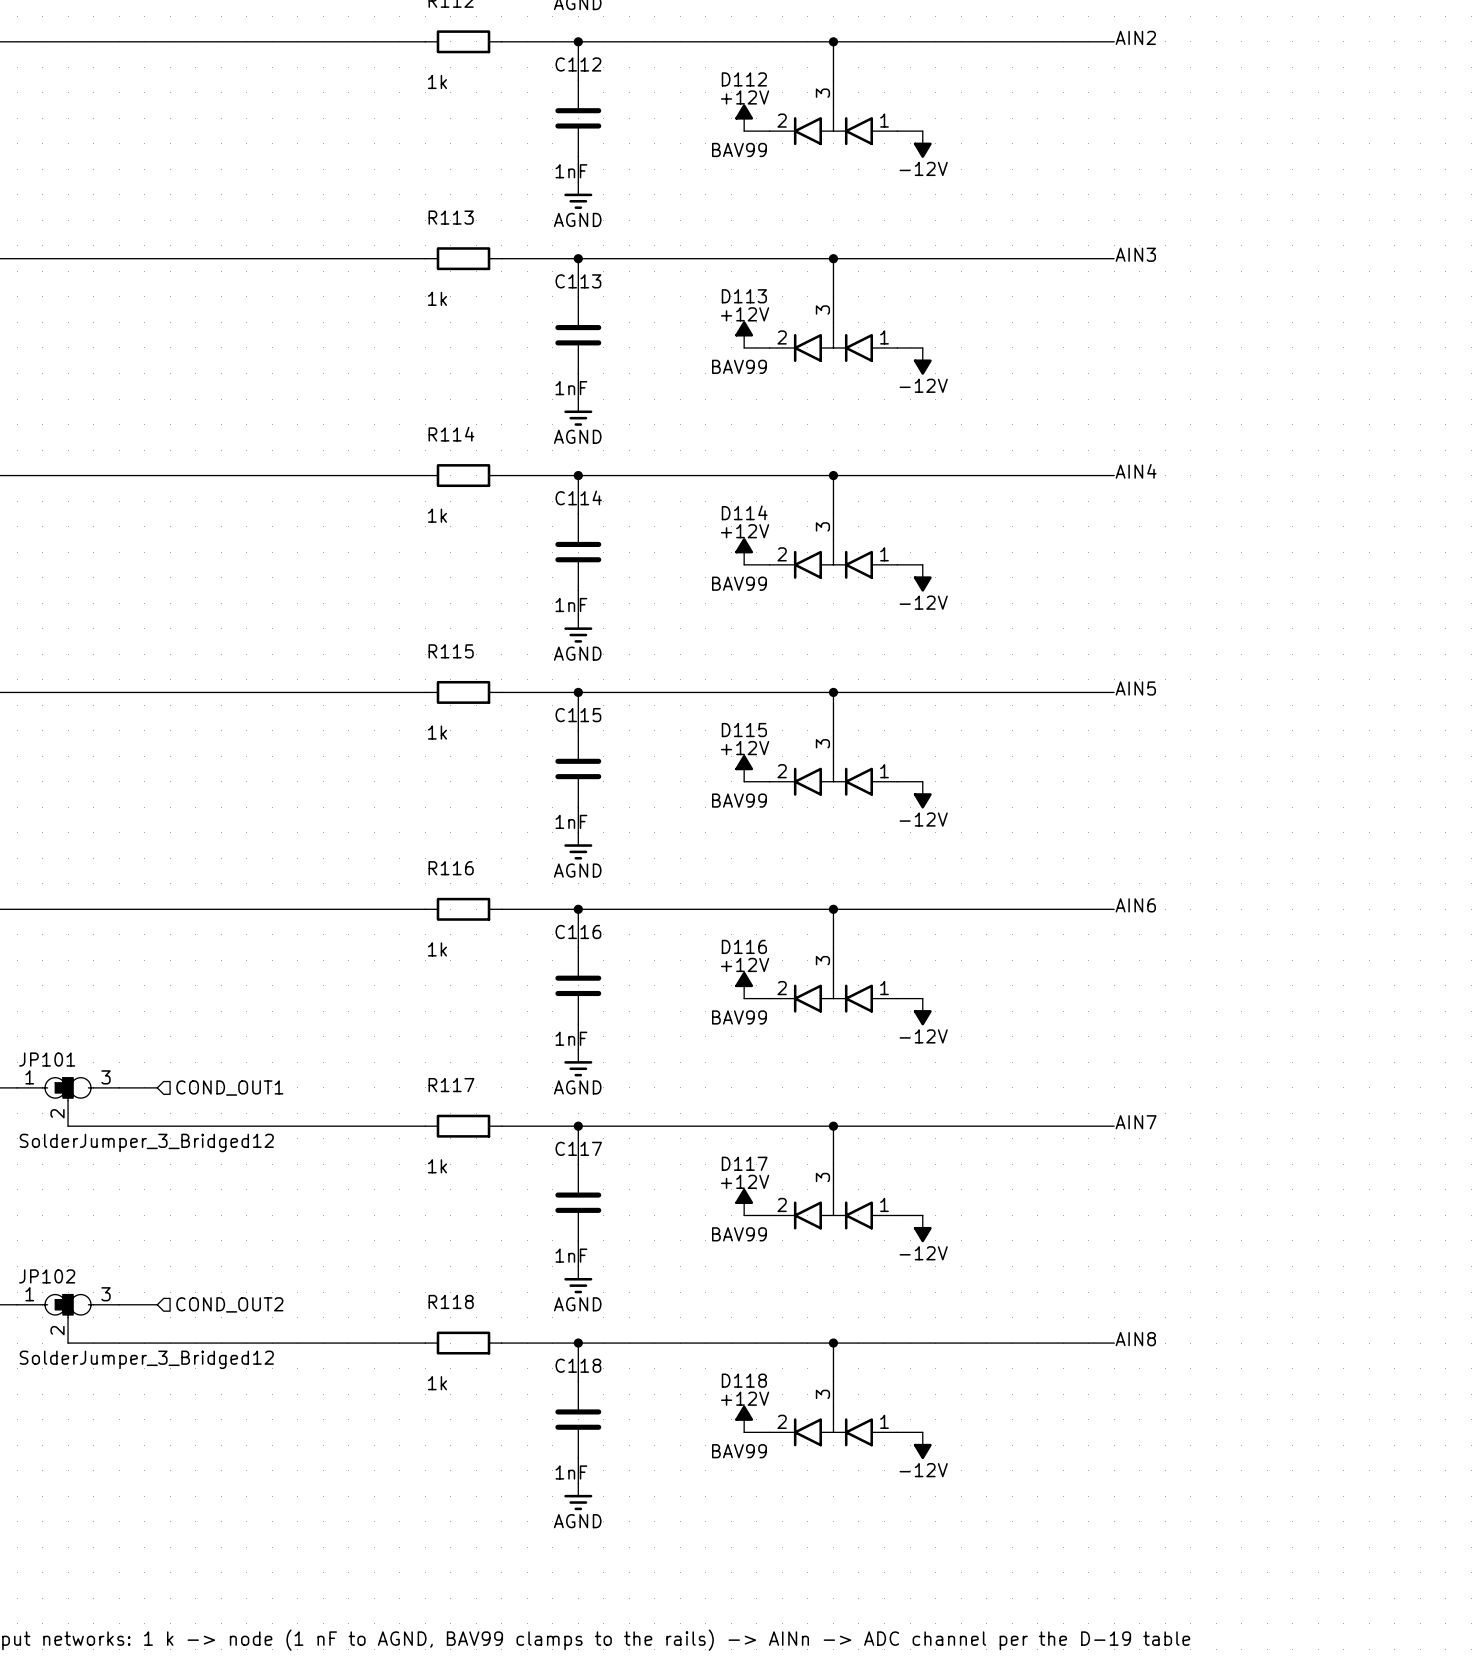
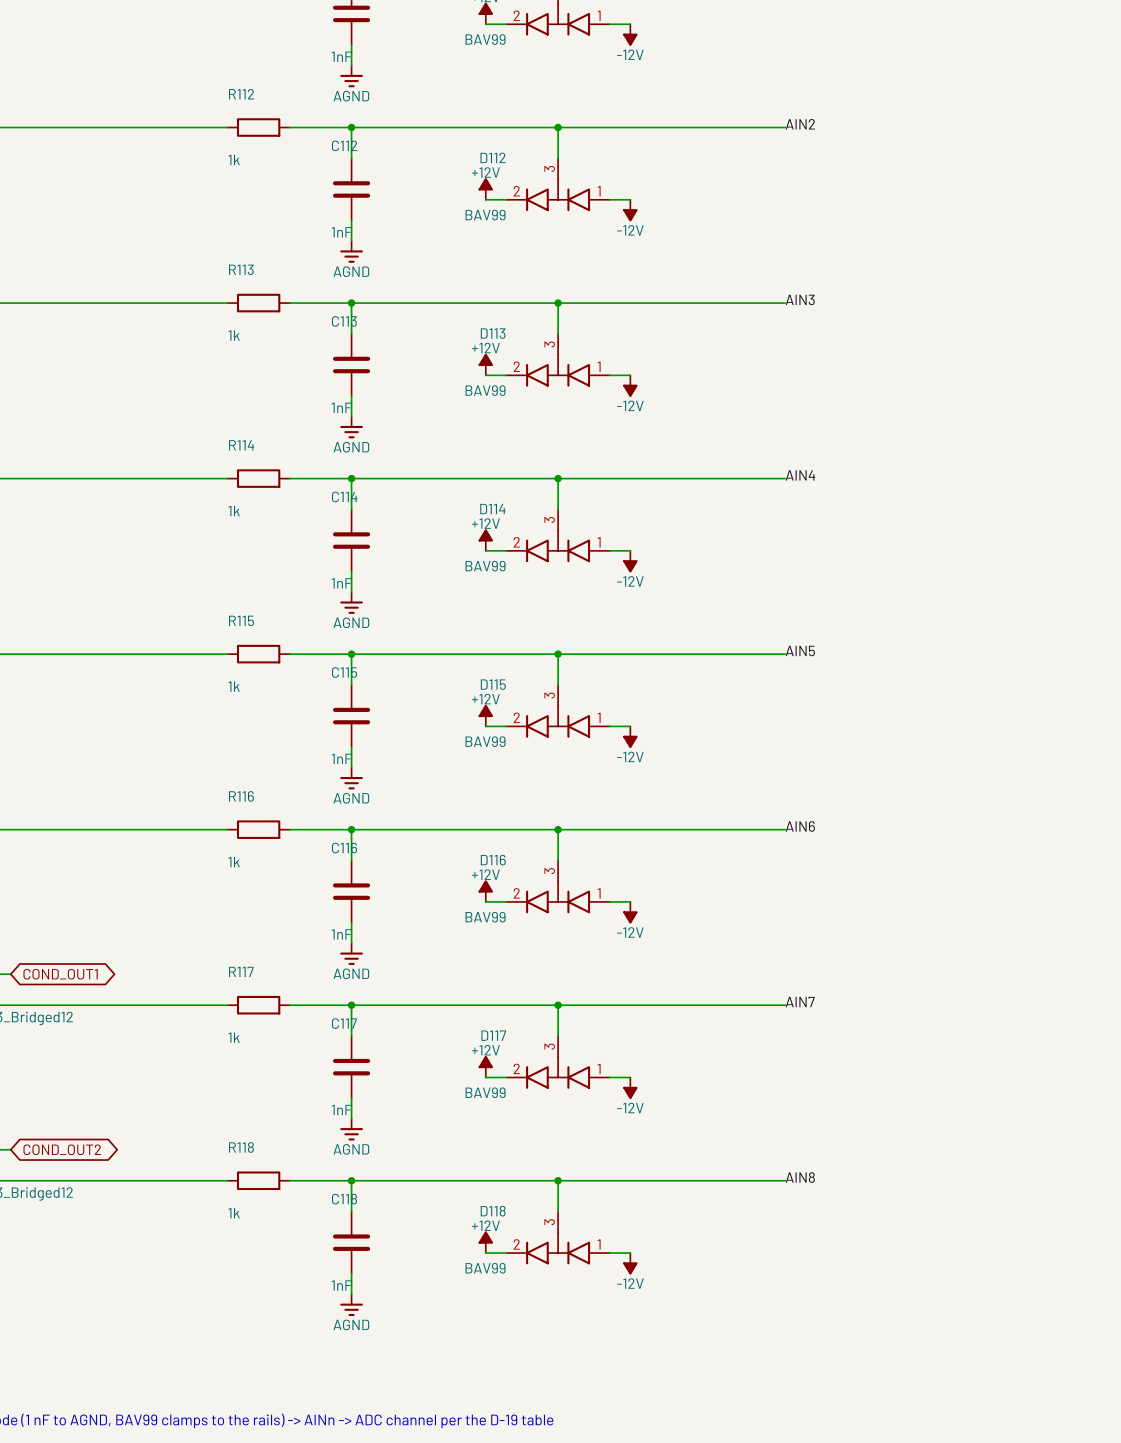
global label: none -> COND_OUT1 (60, 974)
hierarchical label: COND_OUT1 (229, 1088) -> none
hierarchical label: COND_OUT2 (229, 1304) -> none
global label: none -> COND_OUT2 (62, 1149)

